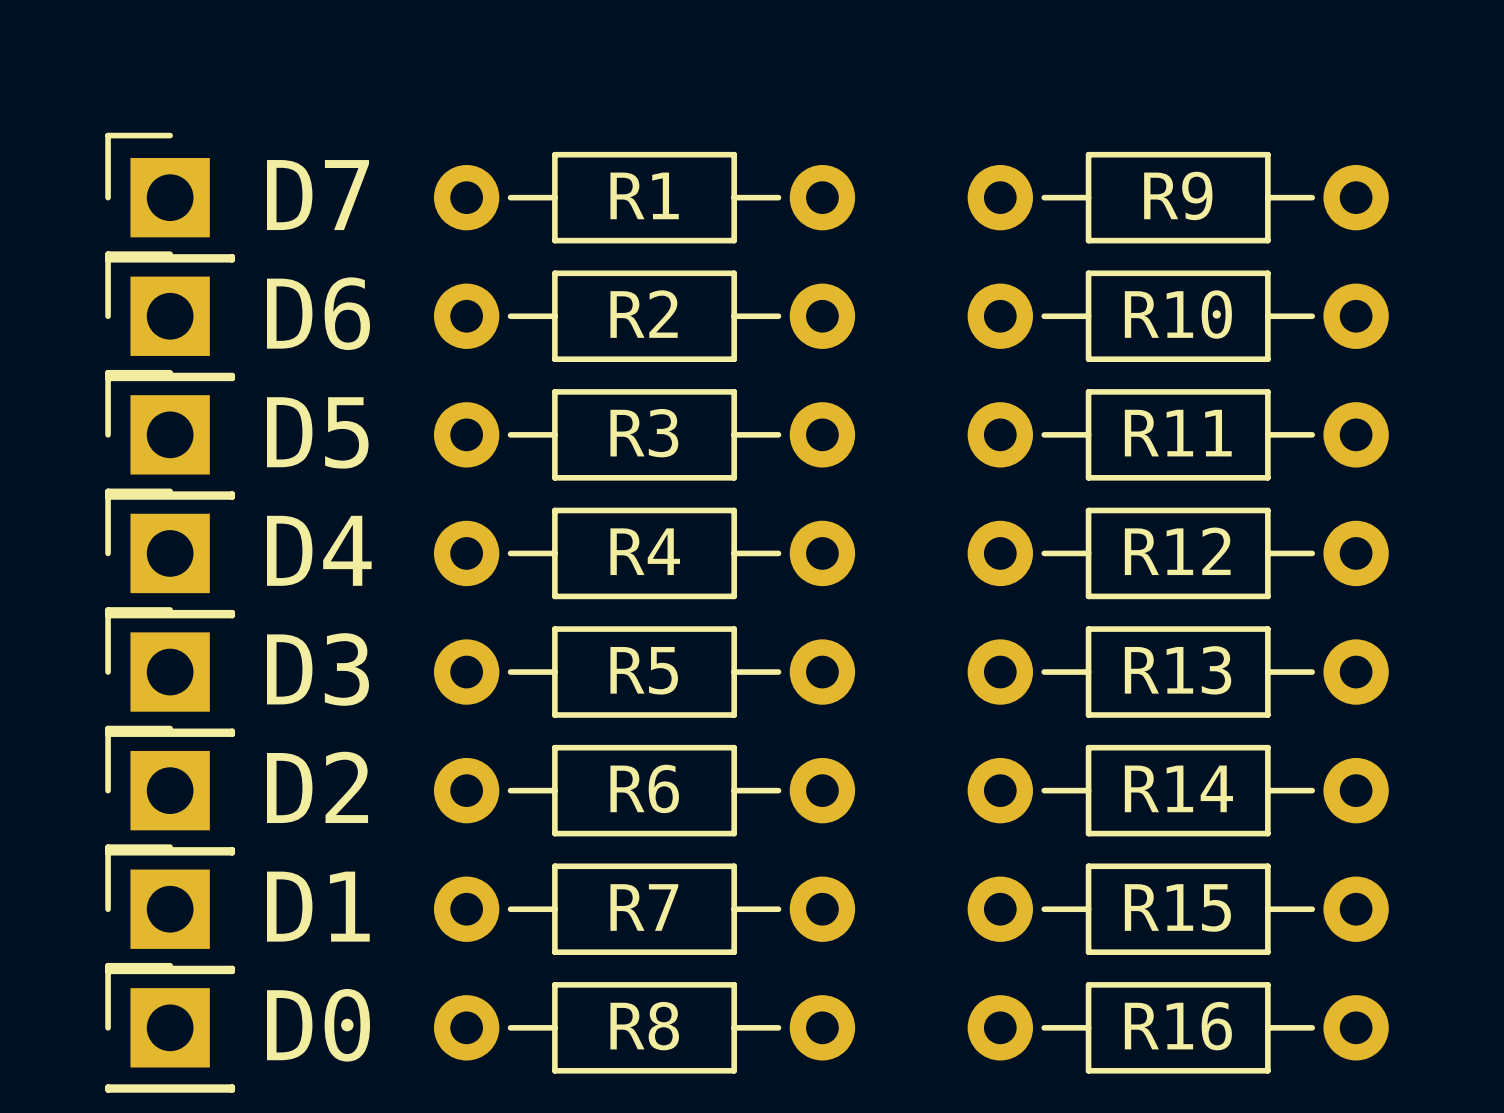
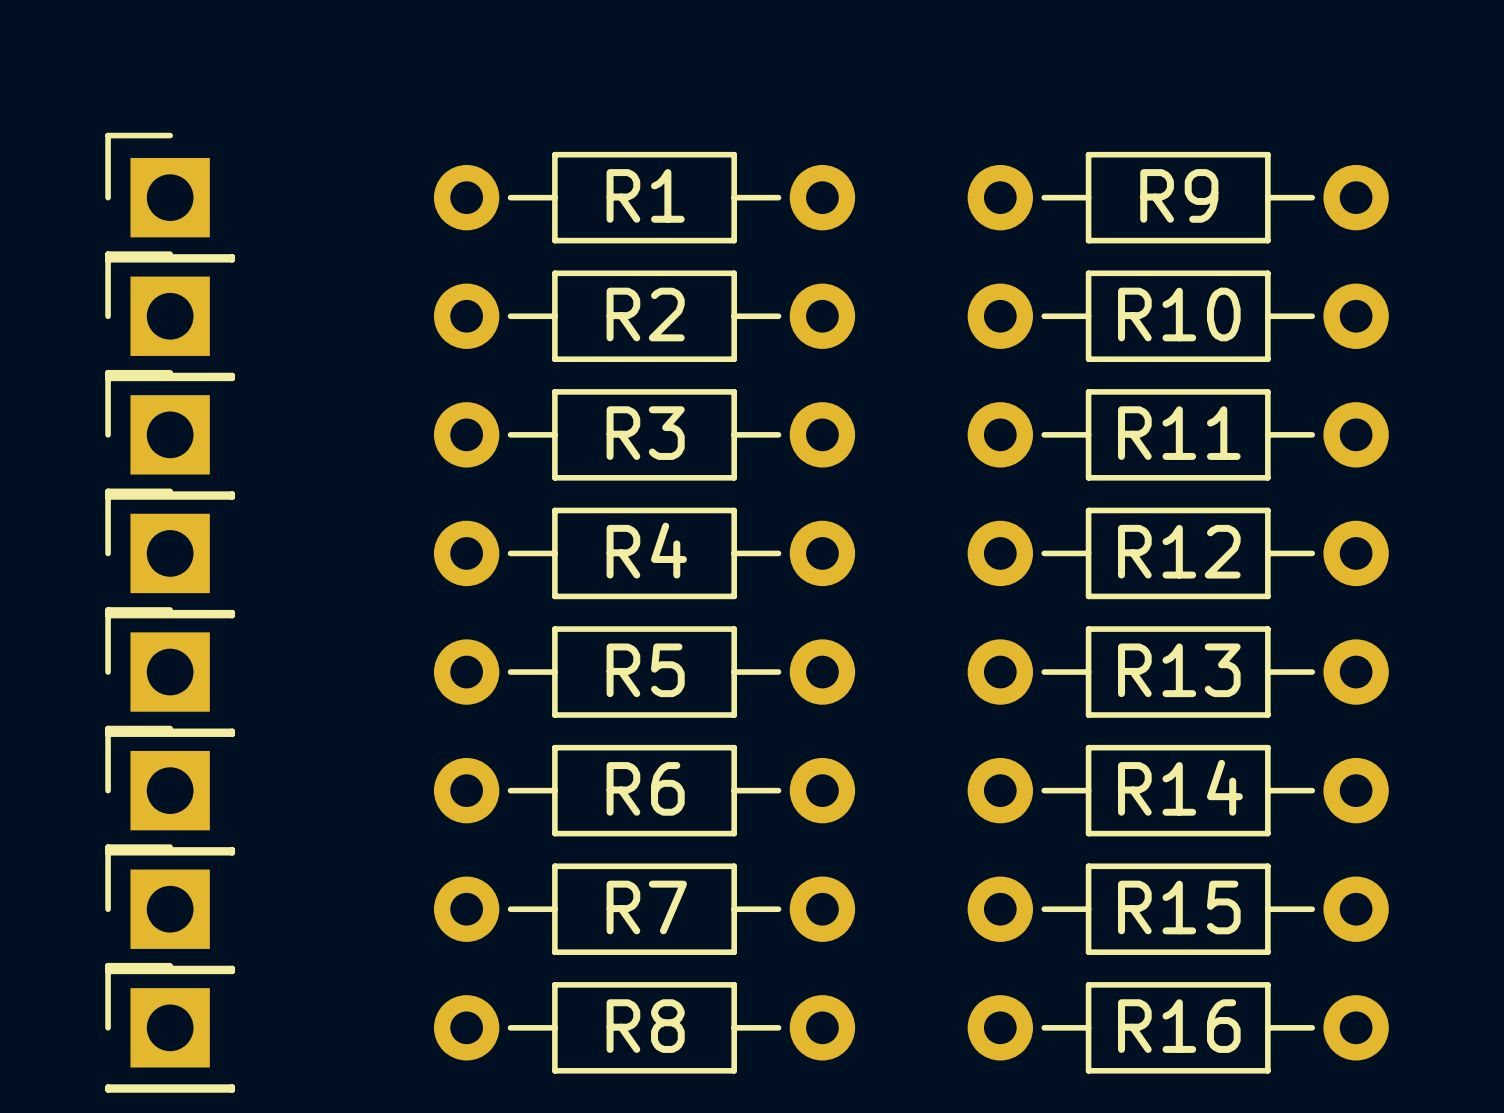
text: D7 (318, 195) -> none
text: D6 (318, 313) -> none
text: D5 (317, 432) -> none
text: D4 (319, 550) -> none
text: D3 (318, 669) -> none
text: D2 (317, 787) -> none
text: D1 (318, 906) -> none
text: D0 (318, 1025) -> none

